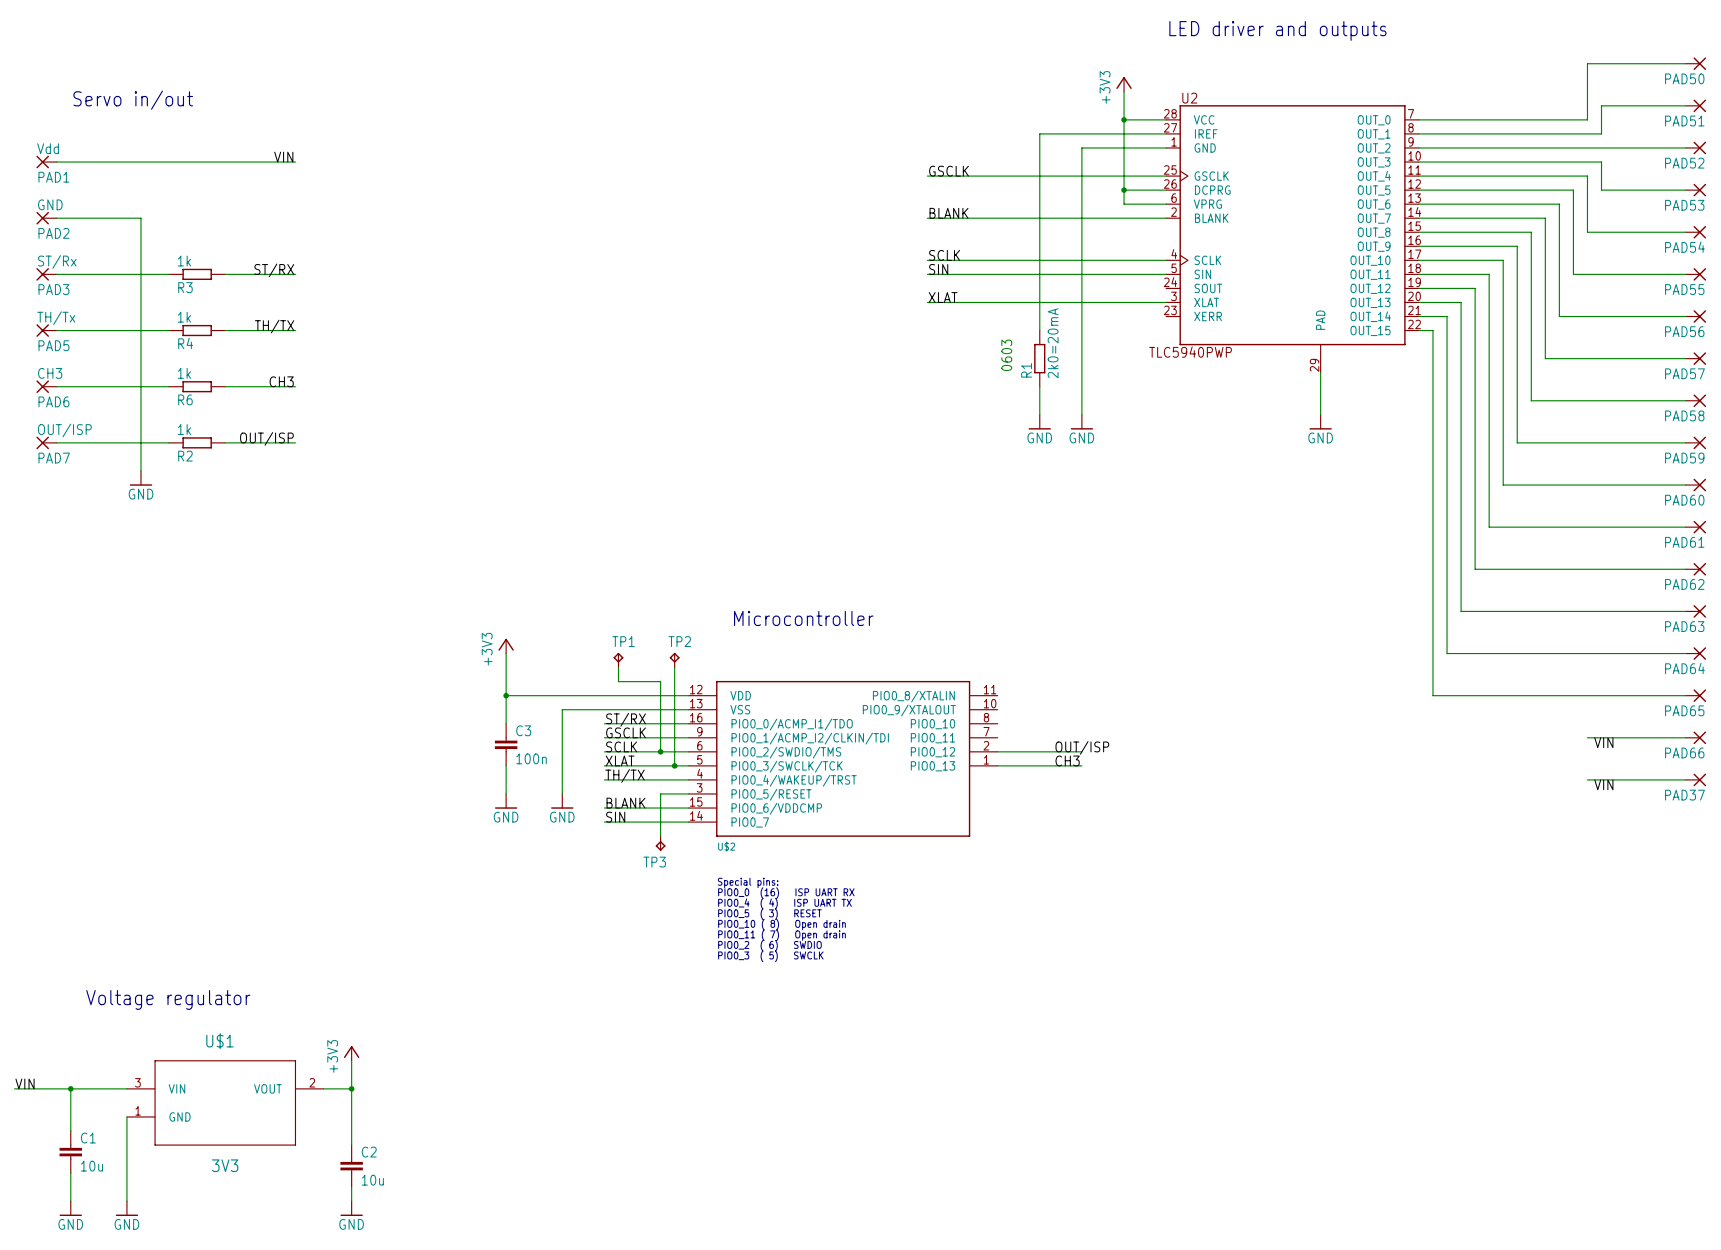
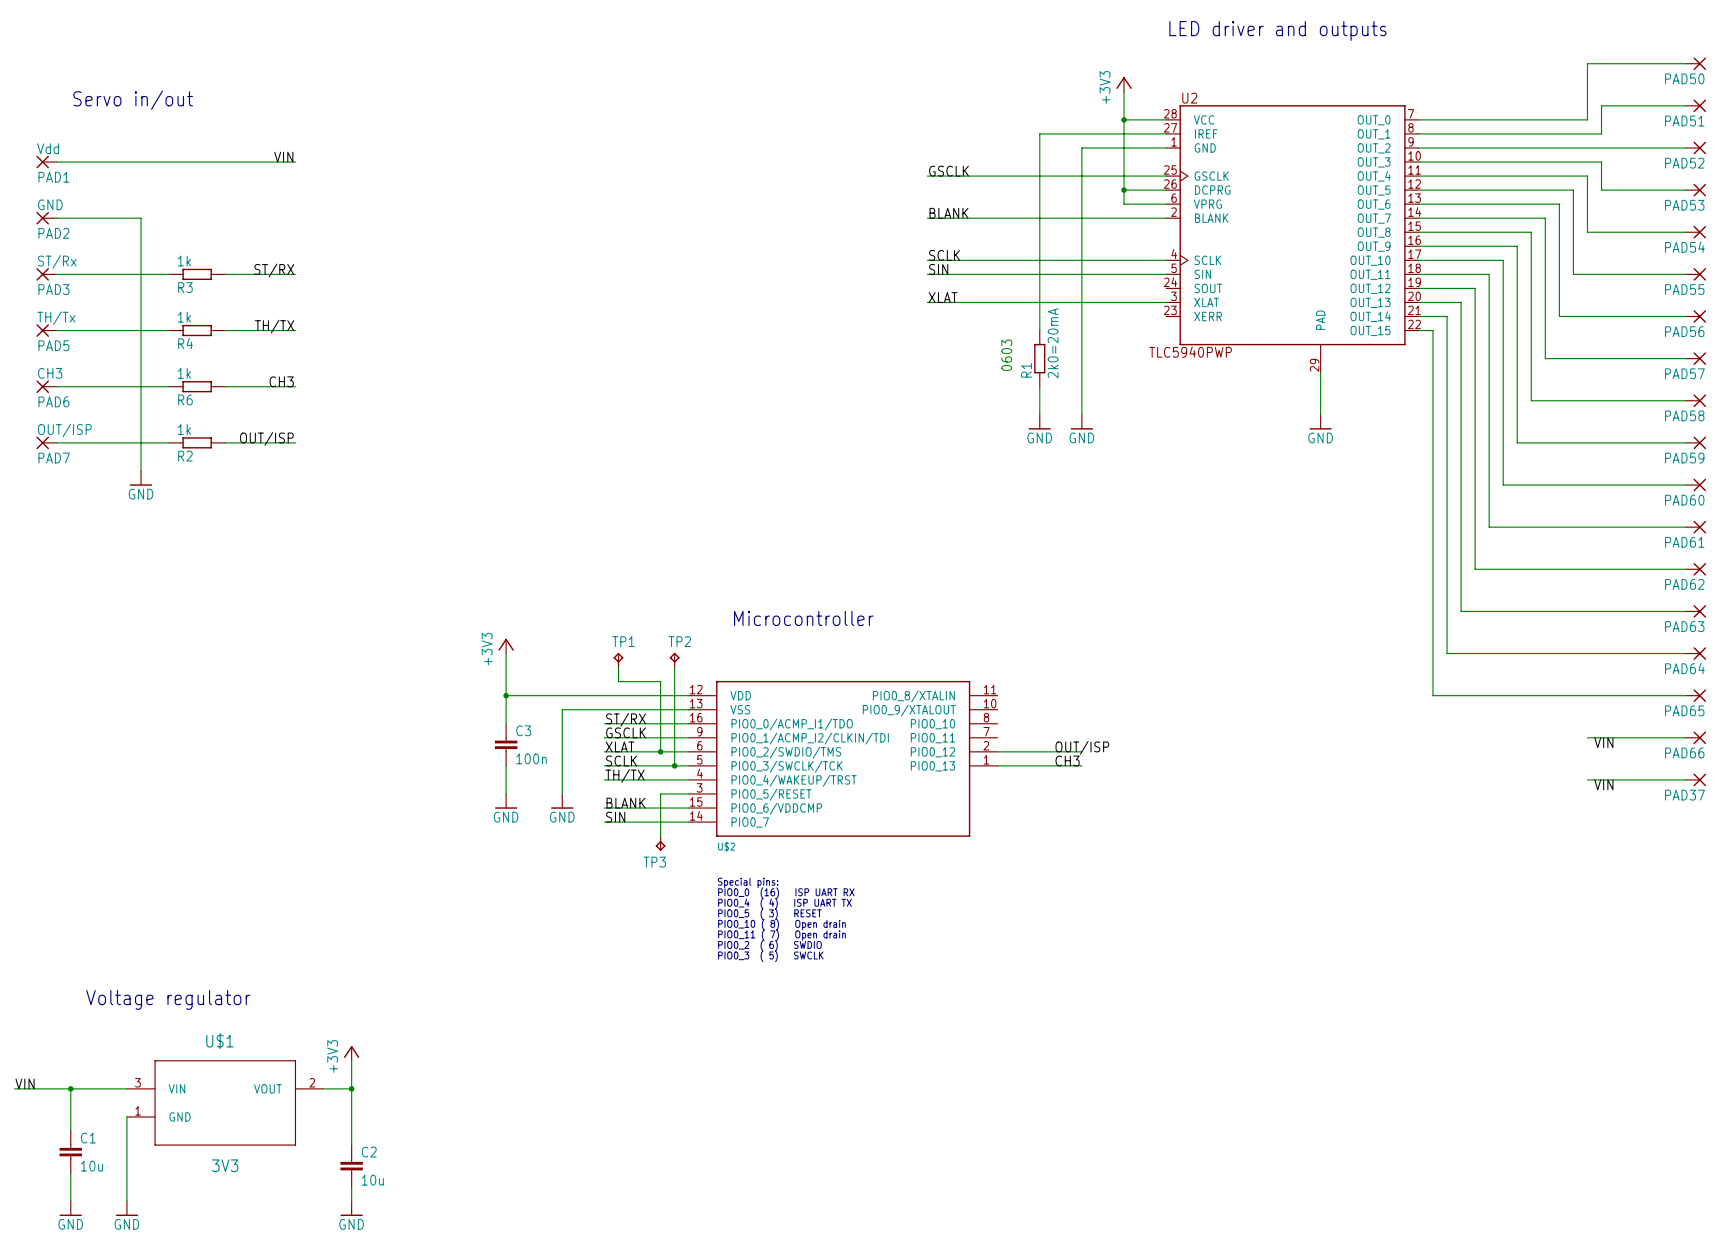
label: SCLK (621, 746) -> XLAT (620, 746)
label: XLAT (620, 760) -> SCLK (621, 760)

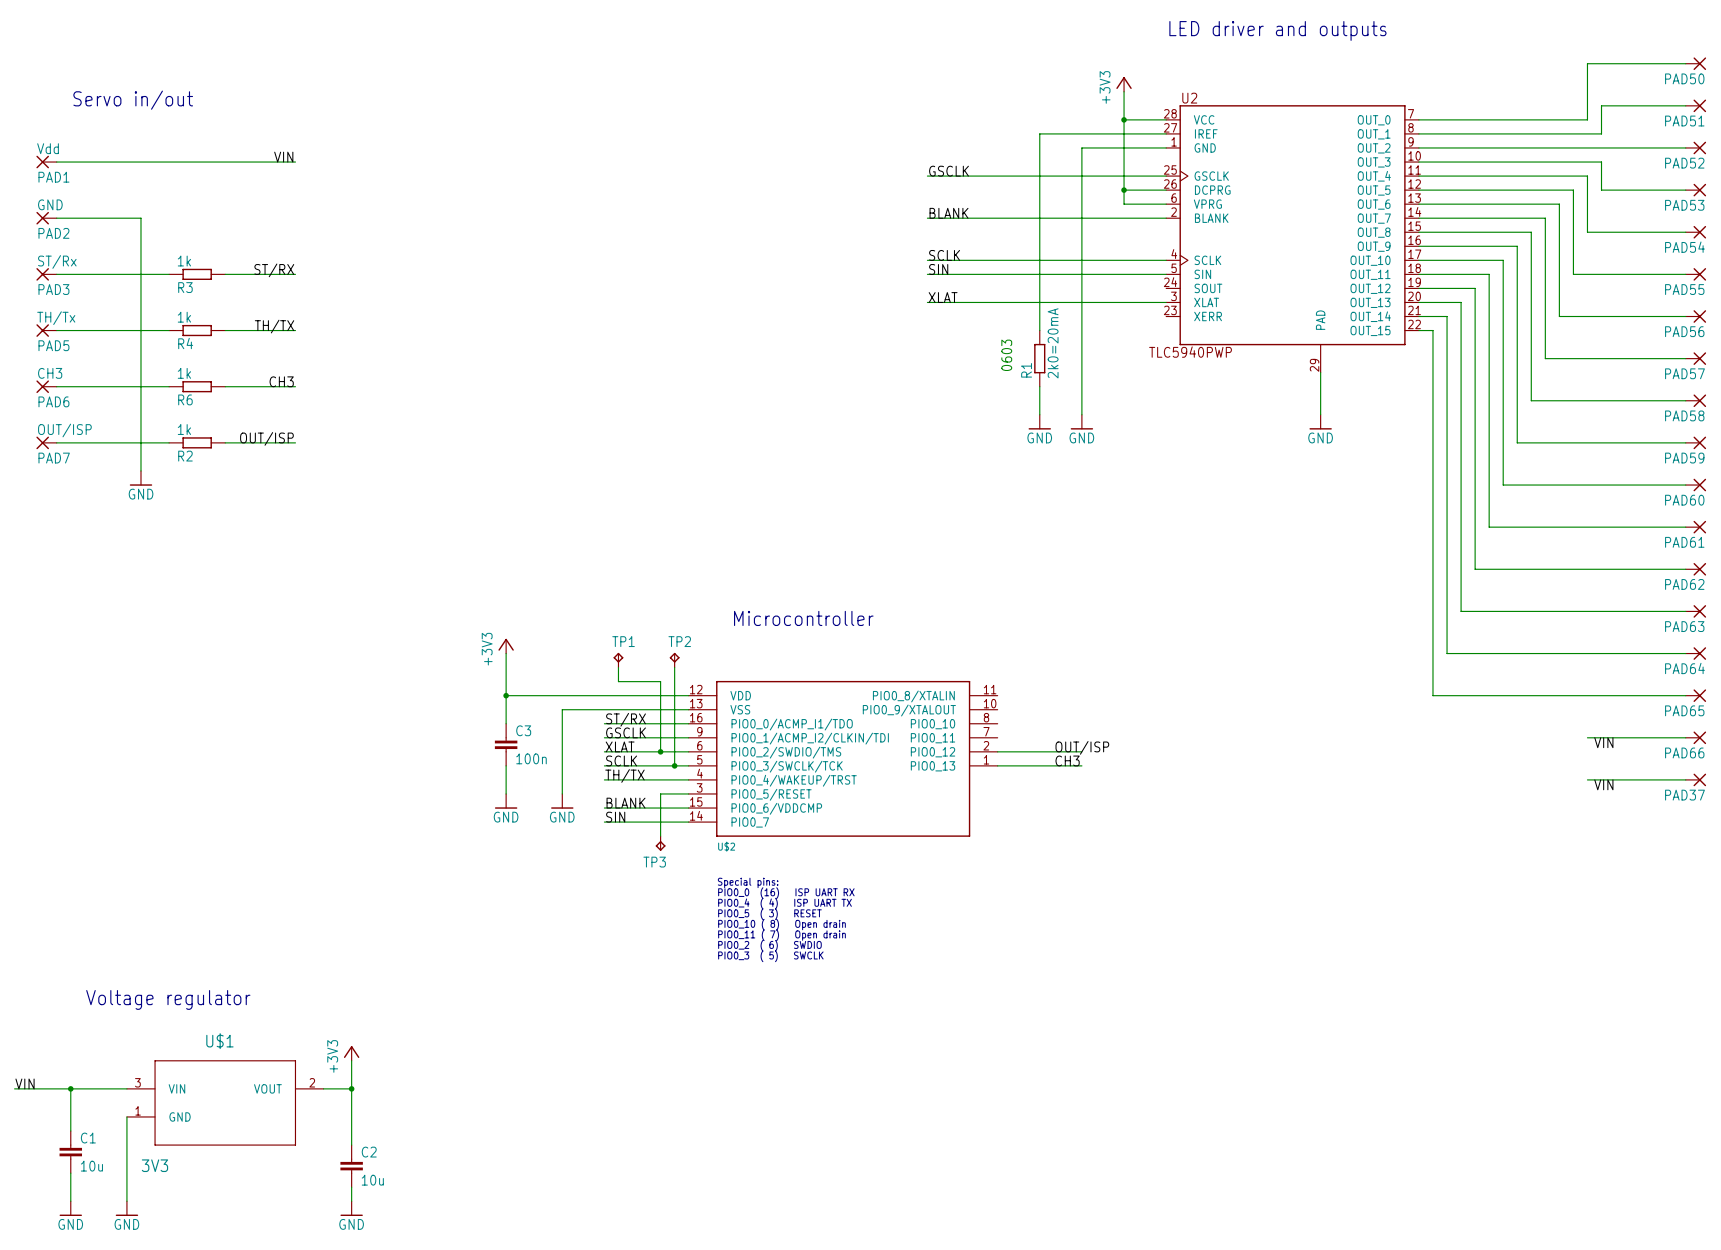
U$1 value position: 3V3 (225, 1165) -> 3V3 (154, 1165)

